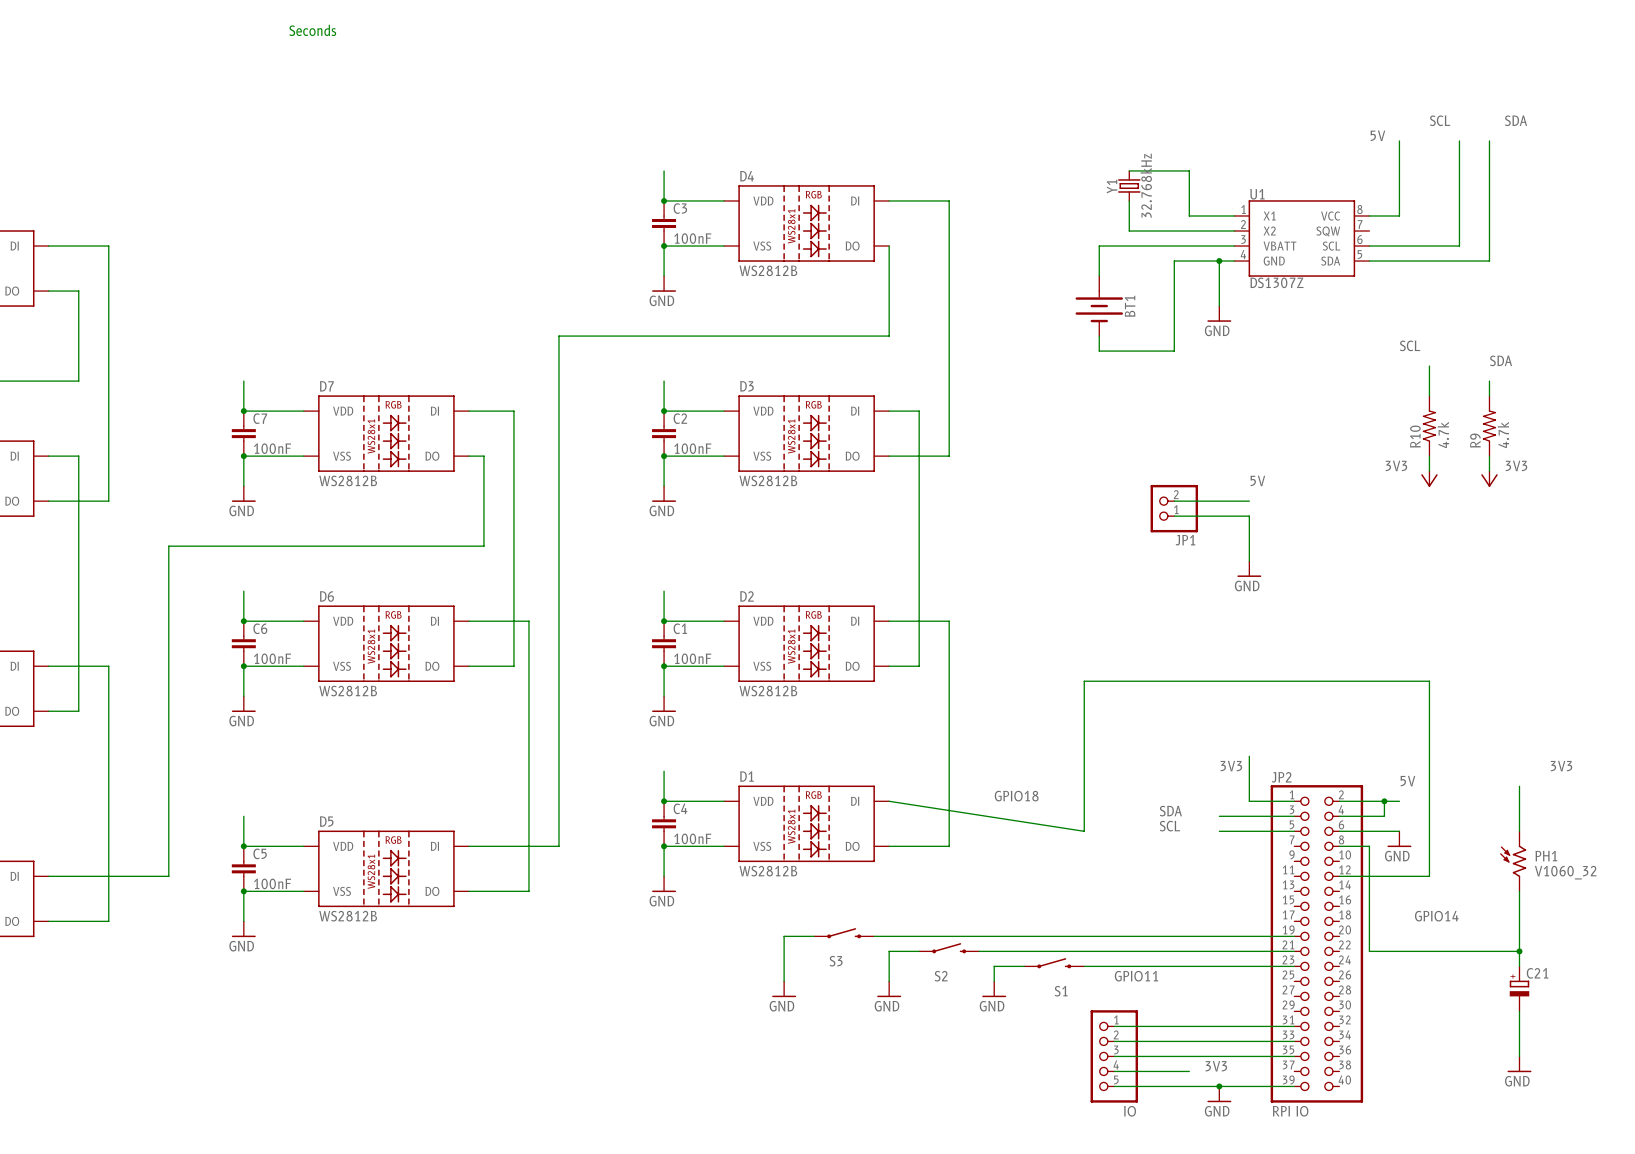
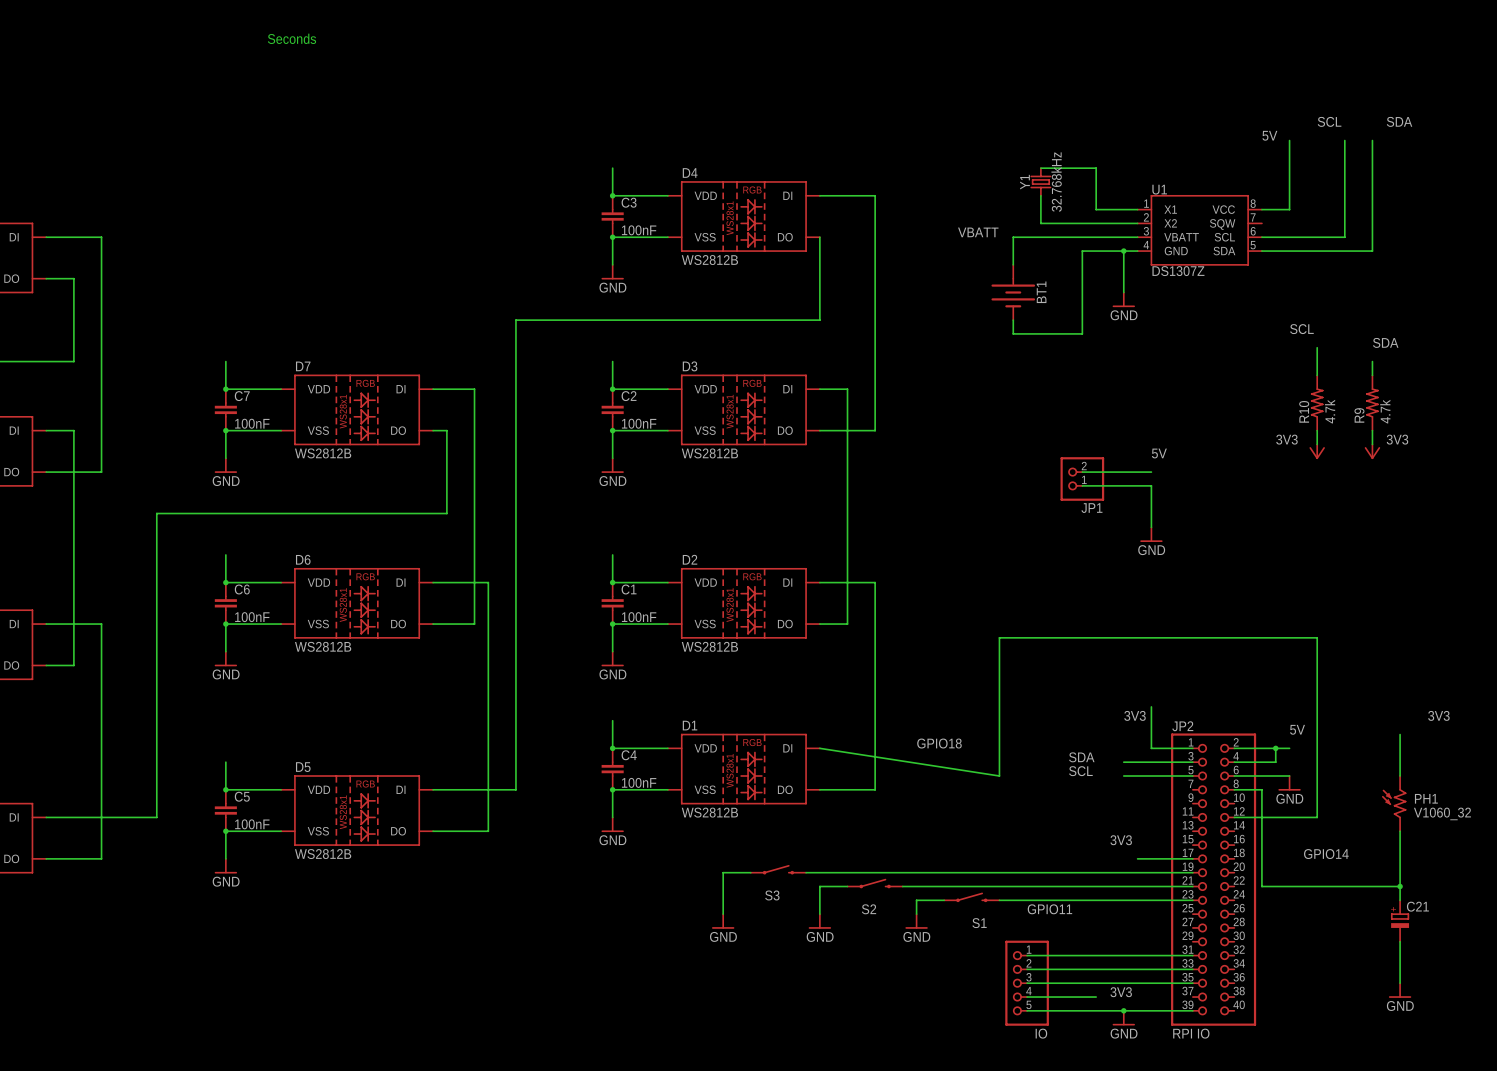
label: none -> VBATT (978, 232)
label: none -> 3V3 (1121, 840)
wire: none -> (1137, 858) (1192, 858)

